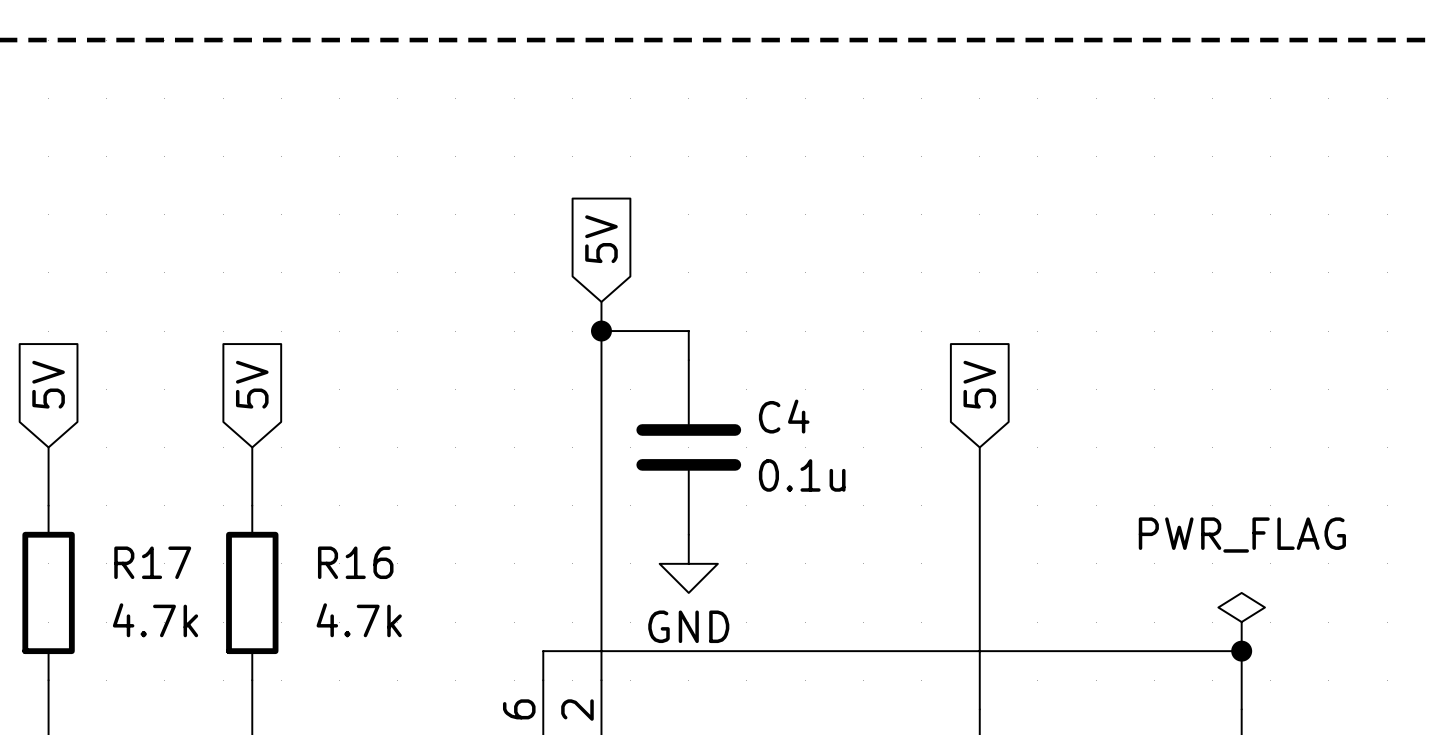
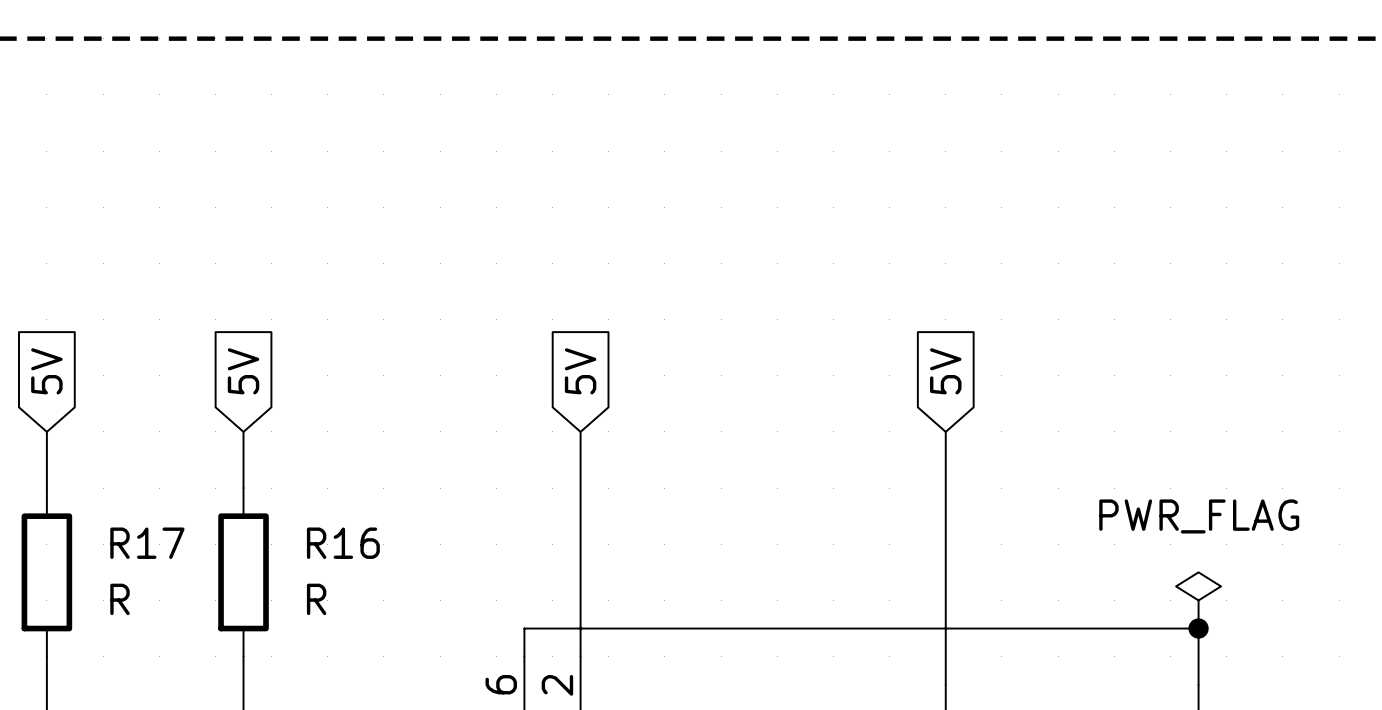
global label position: 5V (601, 239) -> 5V (580, 371)
wire: (601, 301) (601, 447) -> none
wire: (601, 331) (688, 331) (688, 360) -> none
junction: (601, 331) -> none
C4: 0.1u (688, 447) -> none
power symbol: GND (688, 563) -> none
R17 value: 4.7k (155, 620) -> R (120, 599)
R16 value: 4.7k (359, 620) -> R (316, 599)

